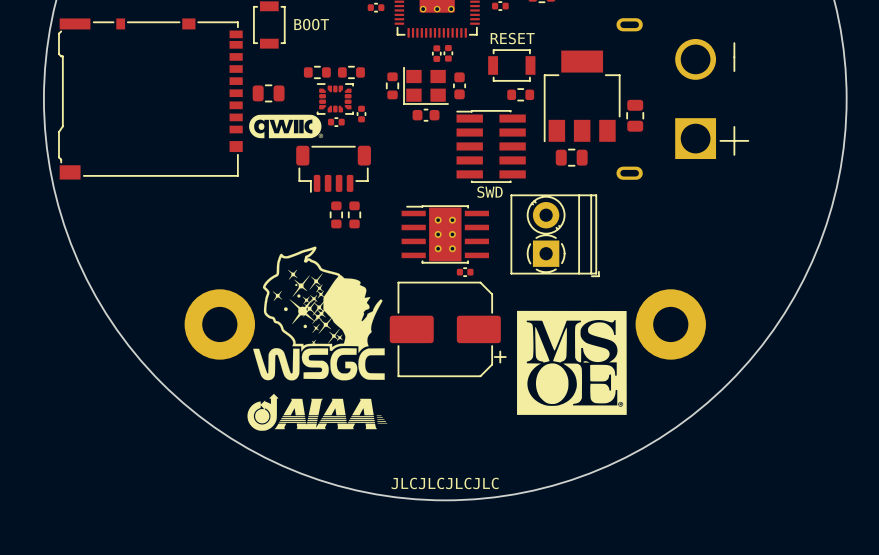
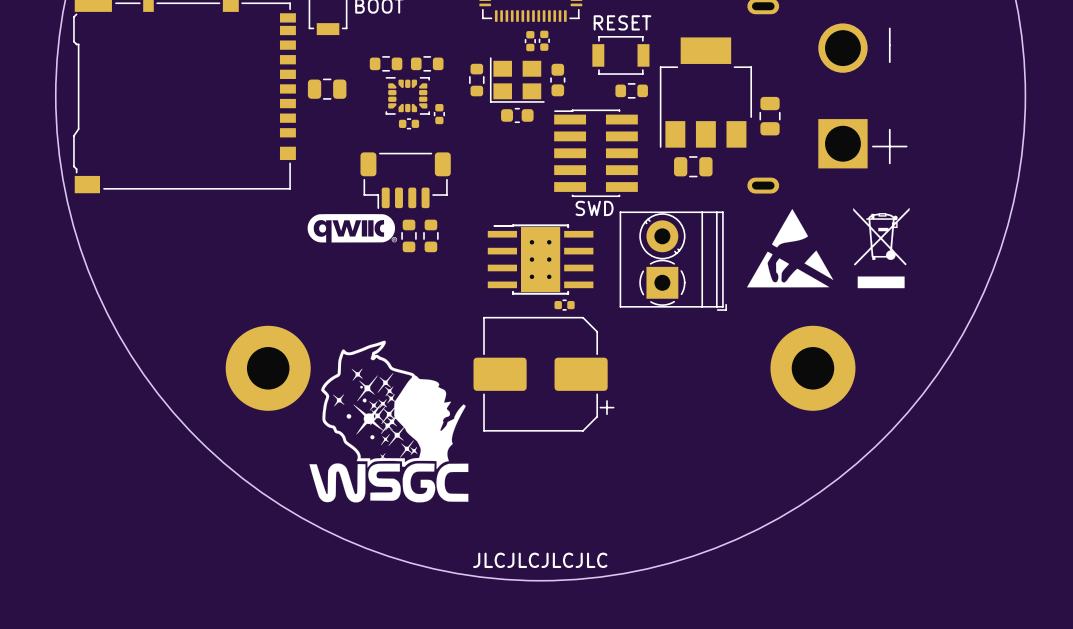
drawing position: (286, 126) -> (352, 228)
drawing: none -> [853, 207, 910, 289]
drawing: none -> [747, 209, 834, 288]
drawing: [517, 310, 627, 415] -> none
drawing position: (318, 313) -> (388, 421)
drawing: [247, 393, 388, 431] -> none

